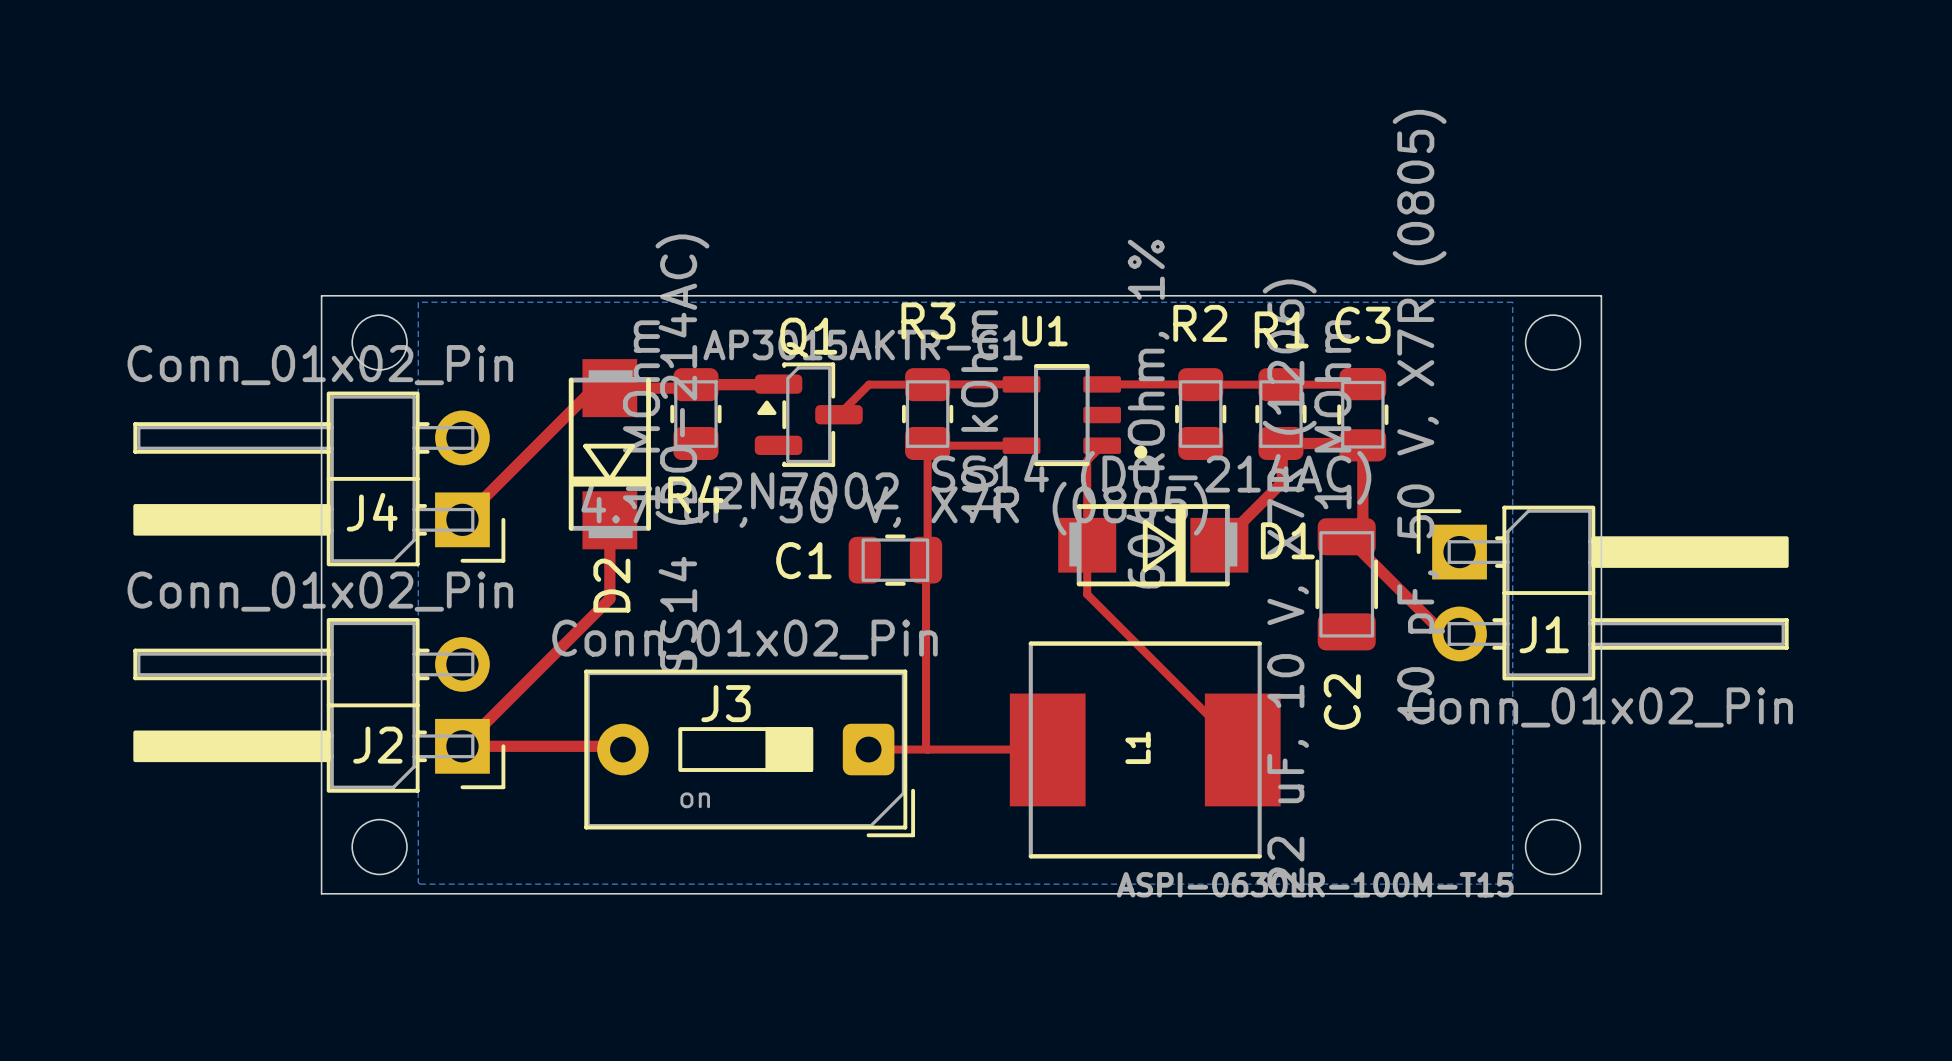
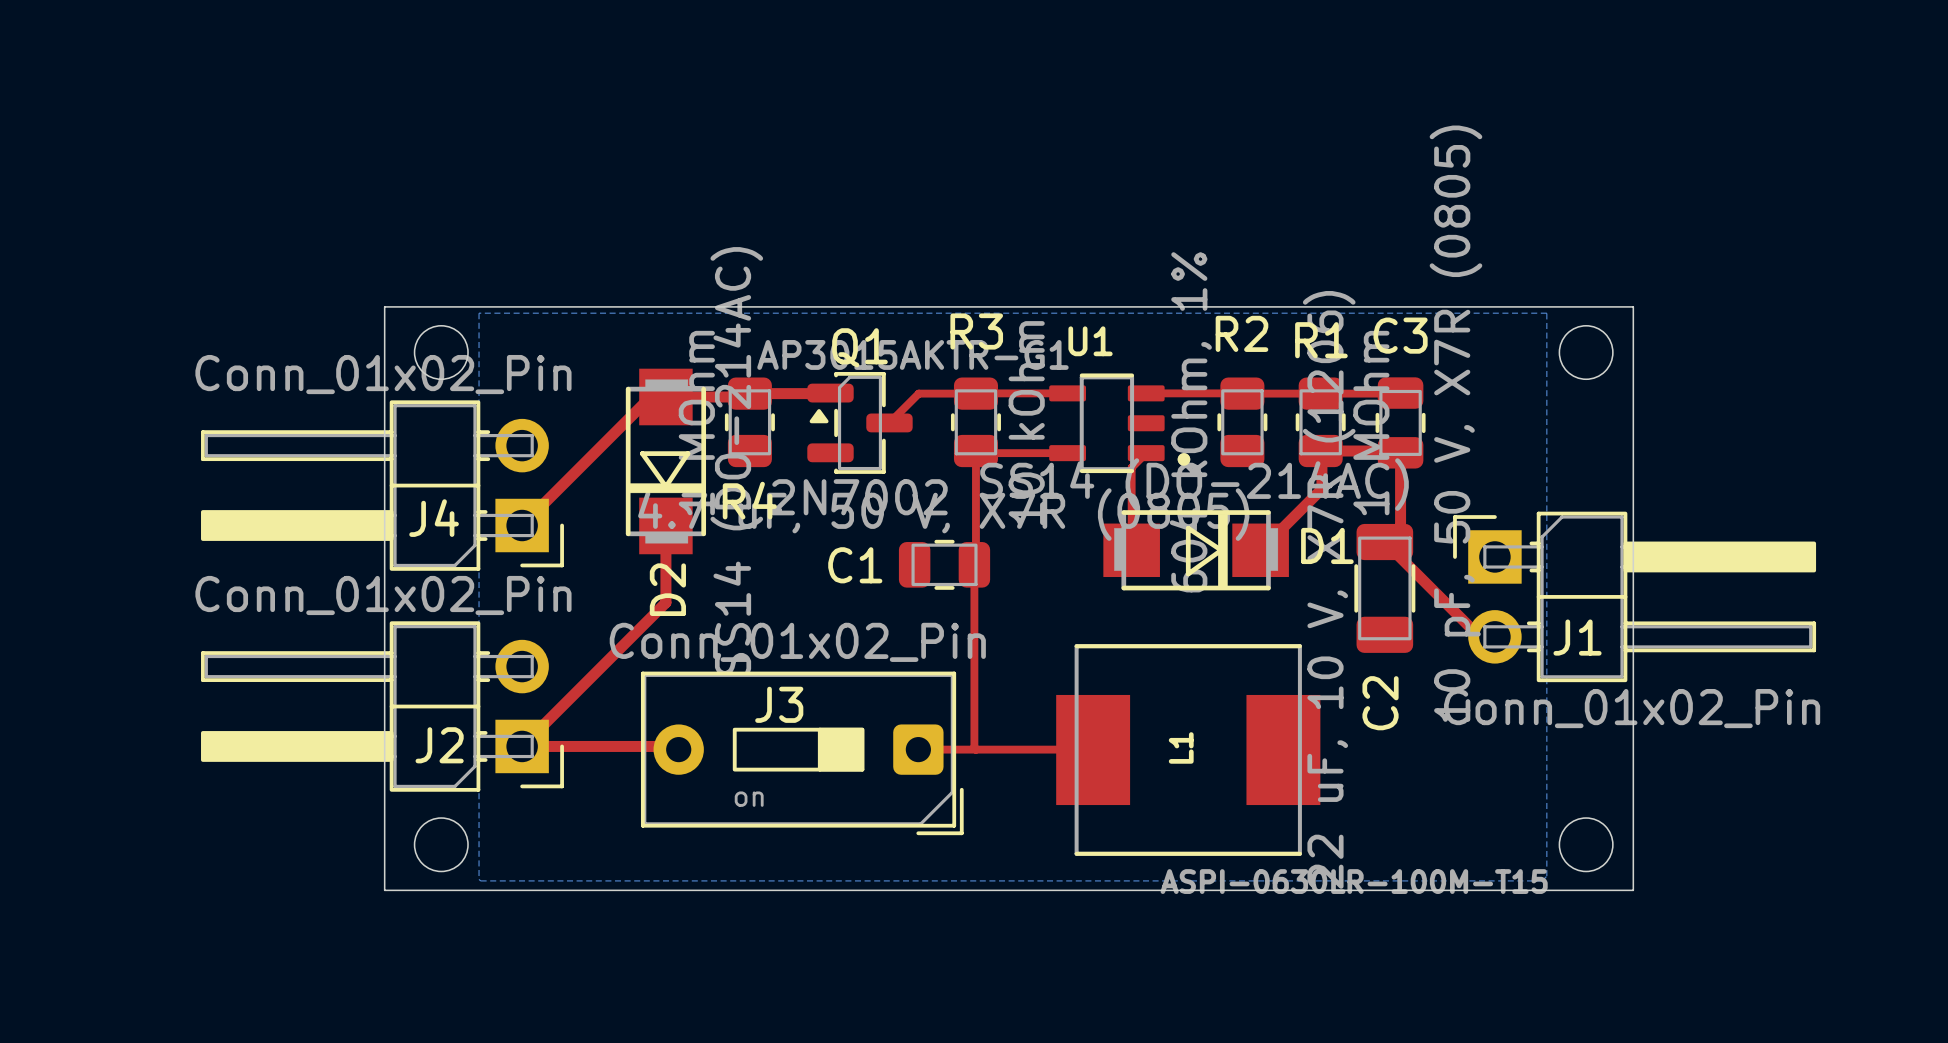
top track: (1087, 545) (1087, 594) (1242, 749) -> none

